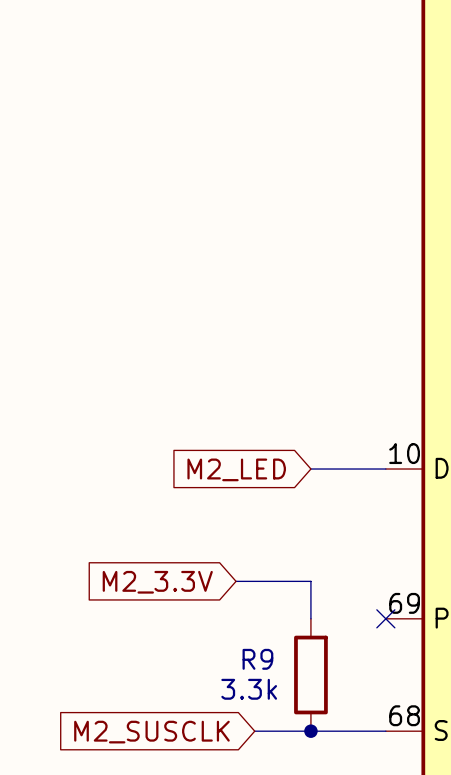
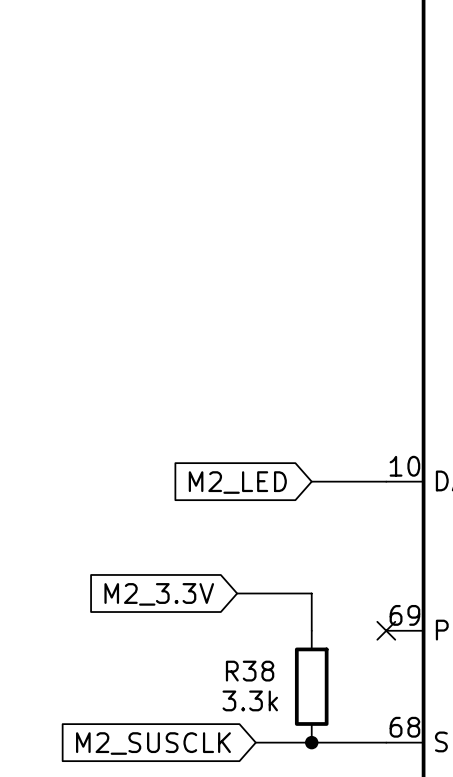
R9 name: R9 (257, 659) -> R38 (250, 671)

